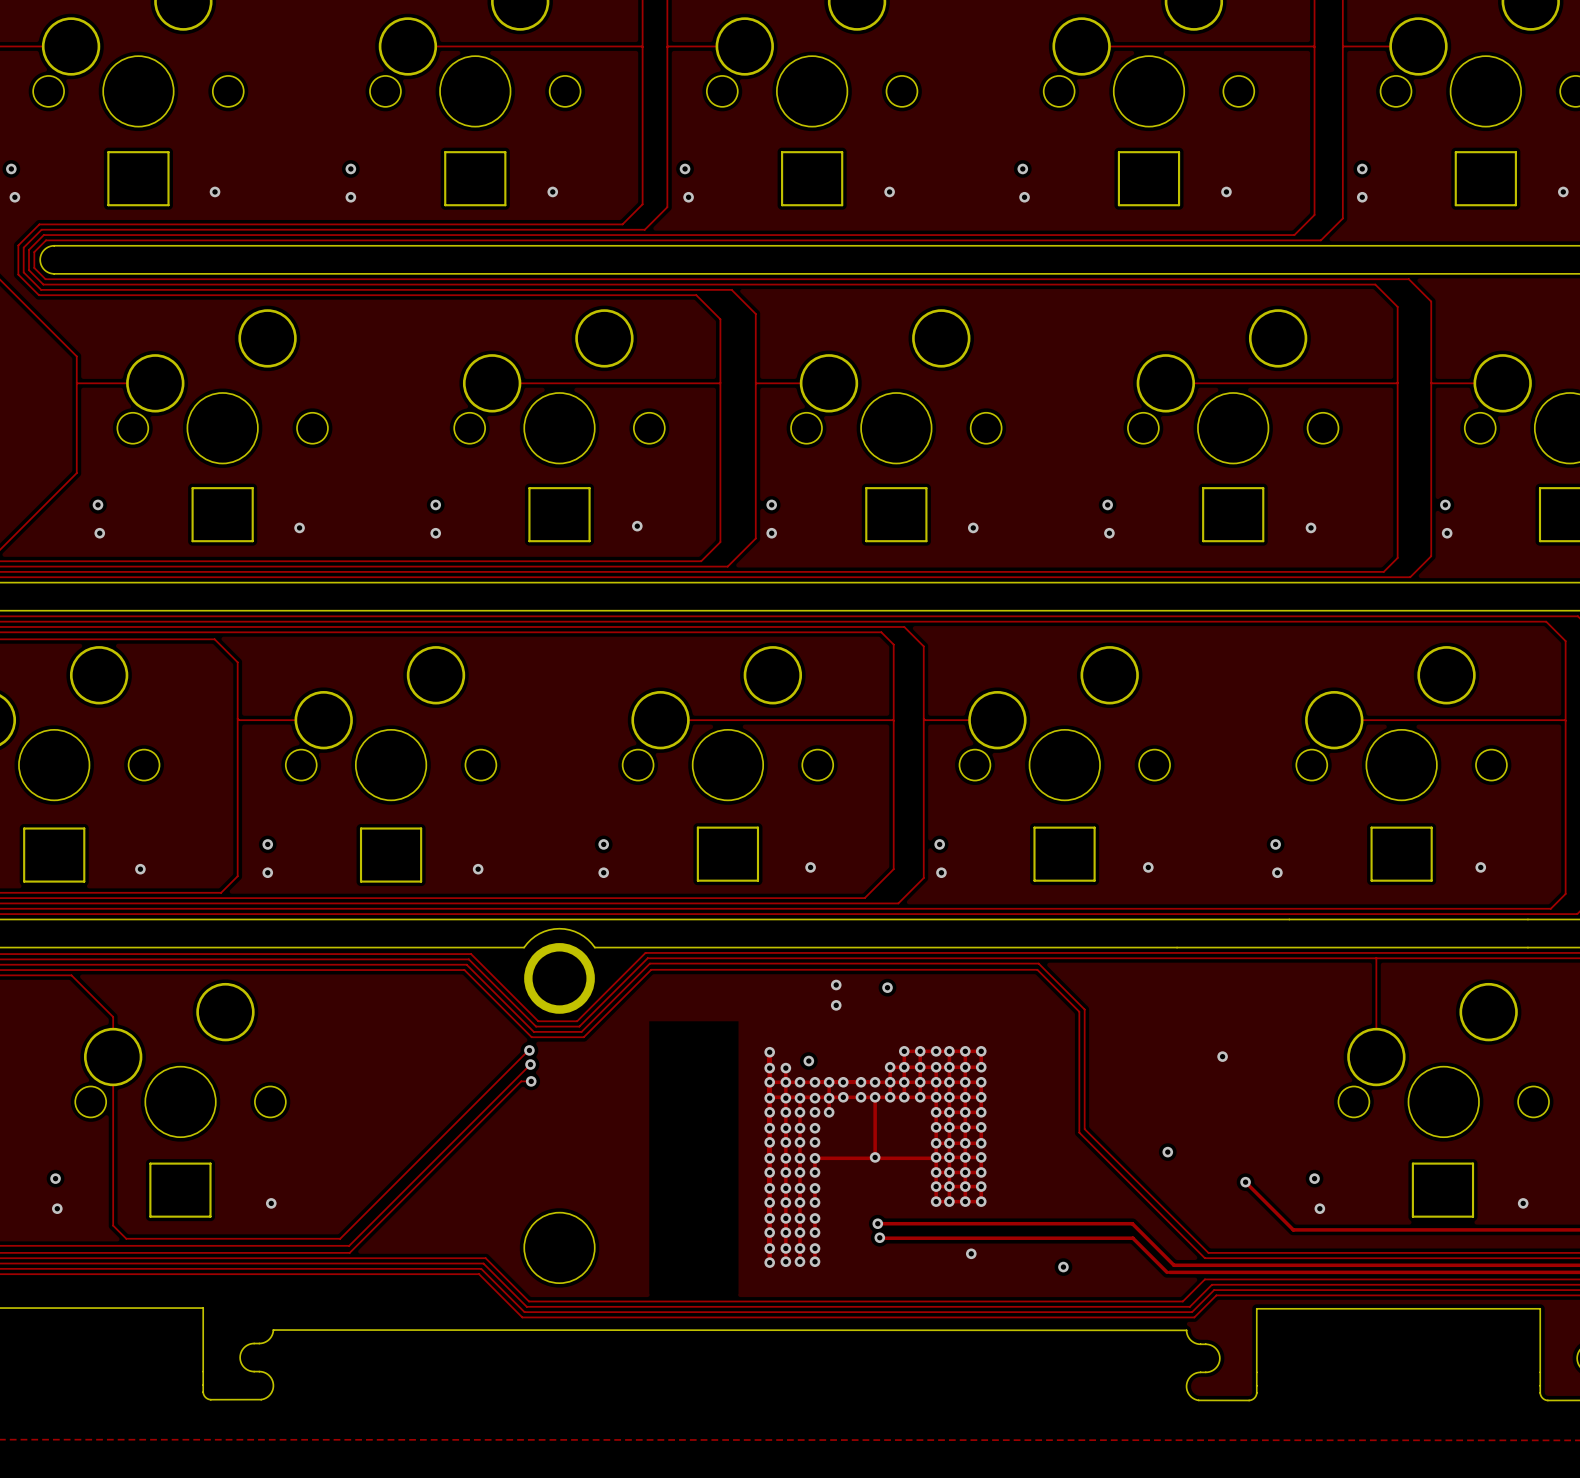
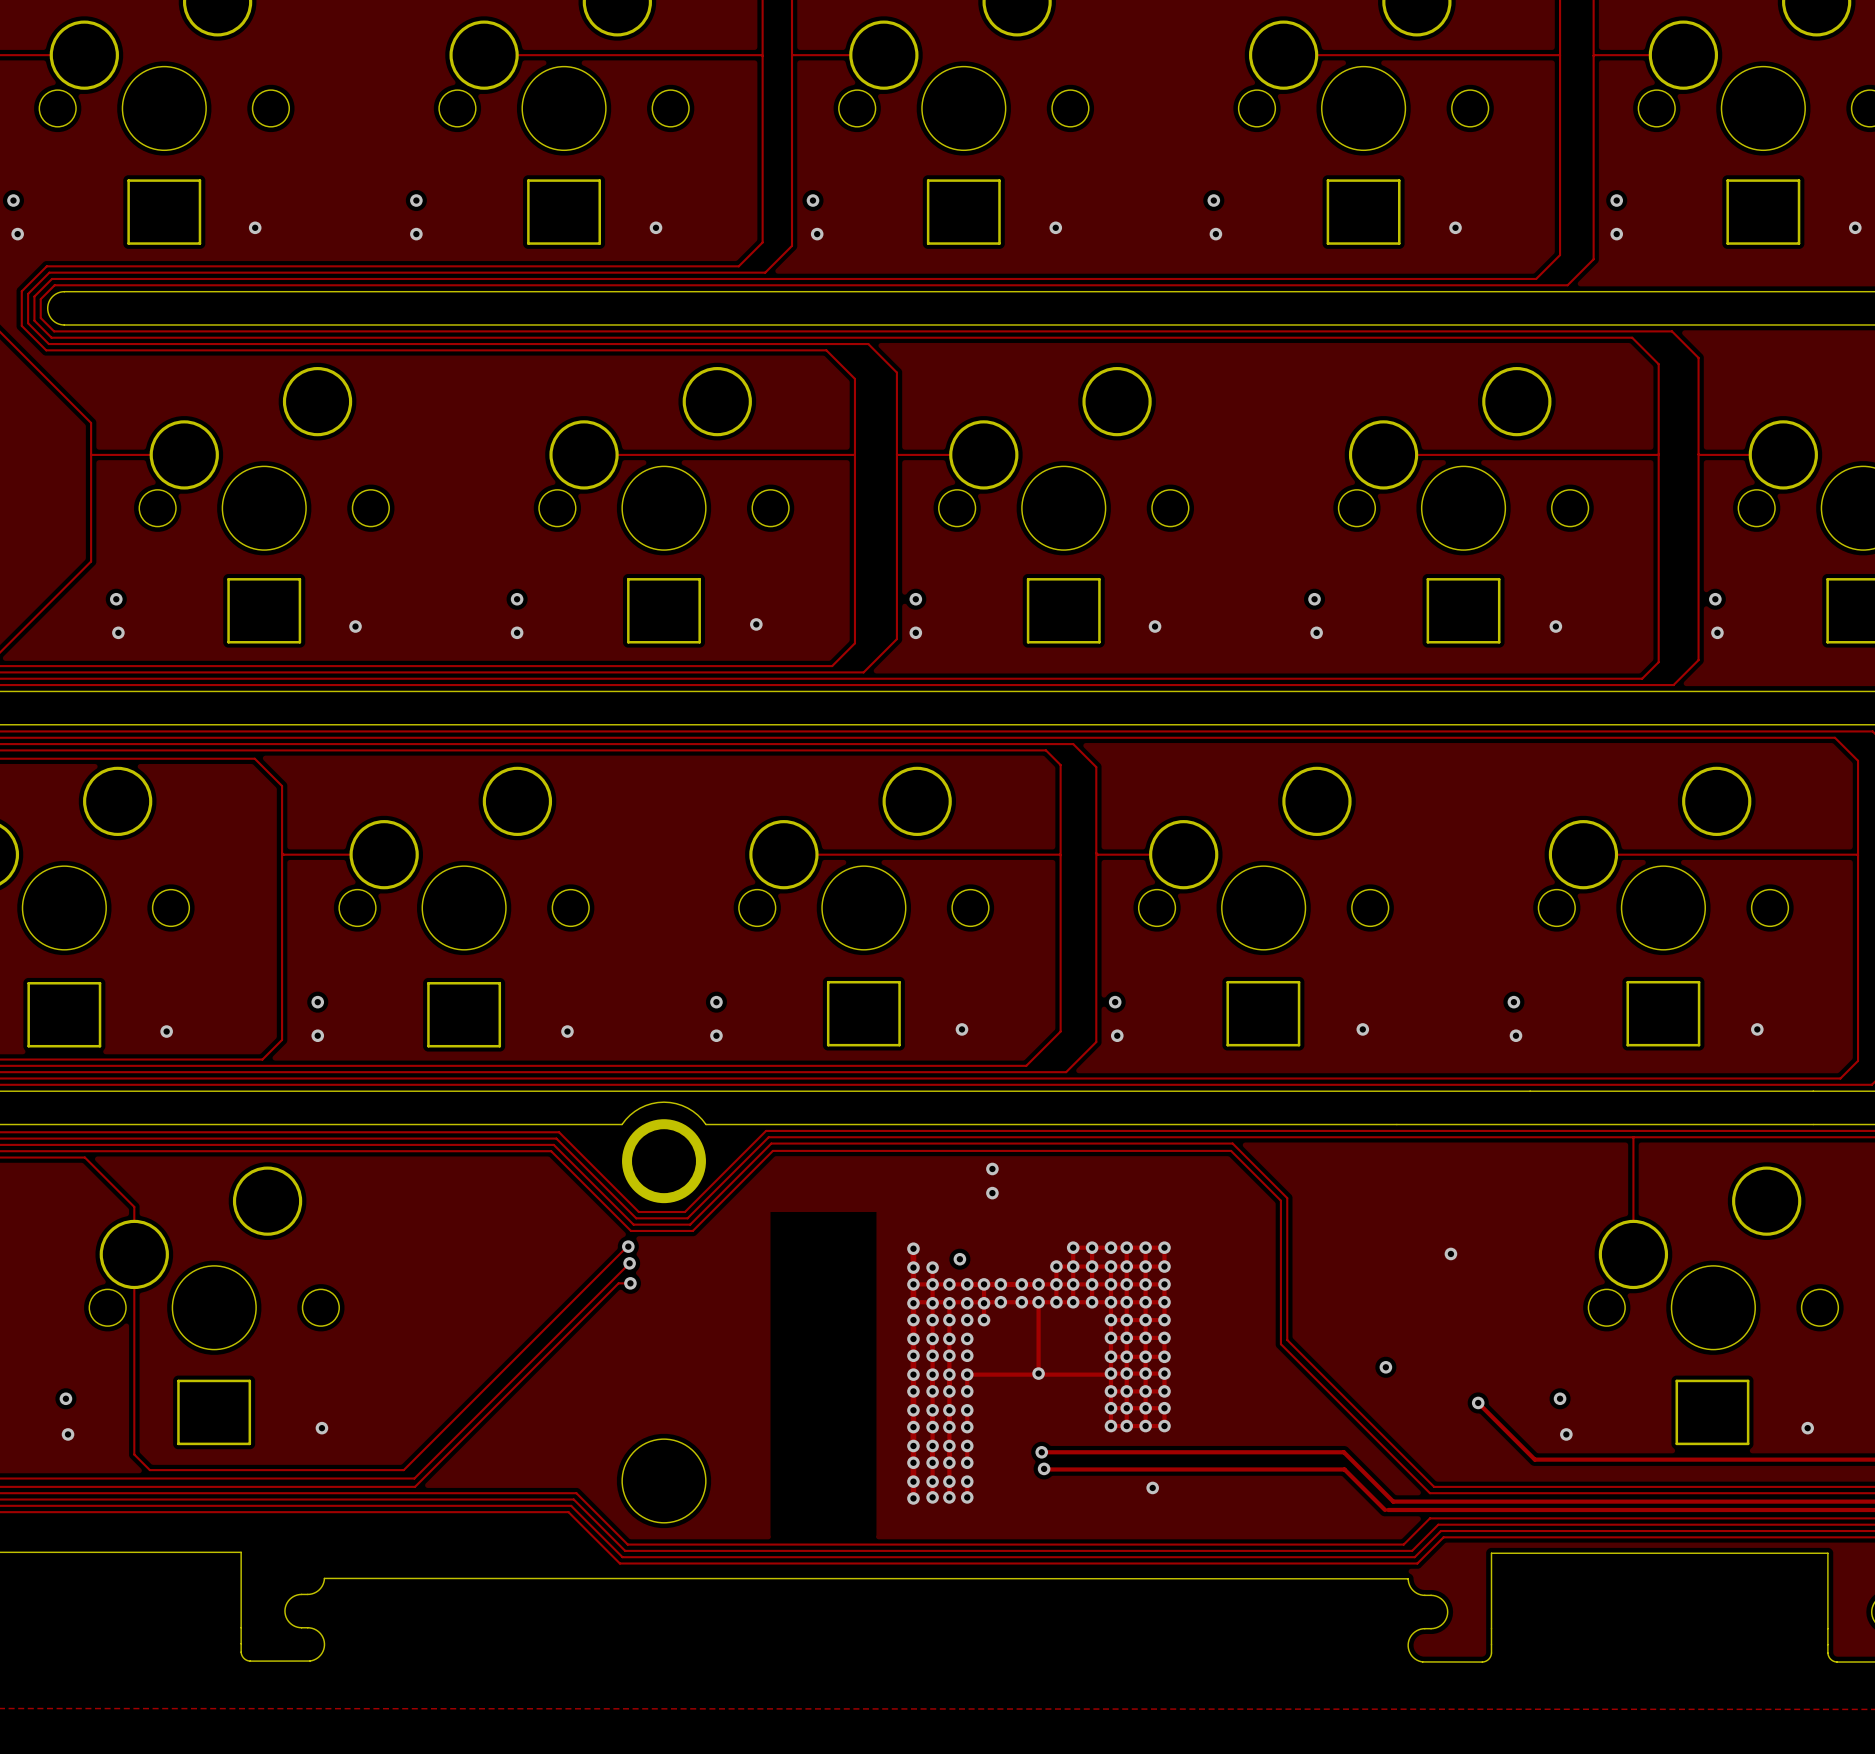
via: (887, 987) -> none
via: (1063, 1267) -> none

